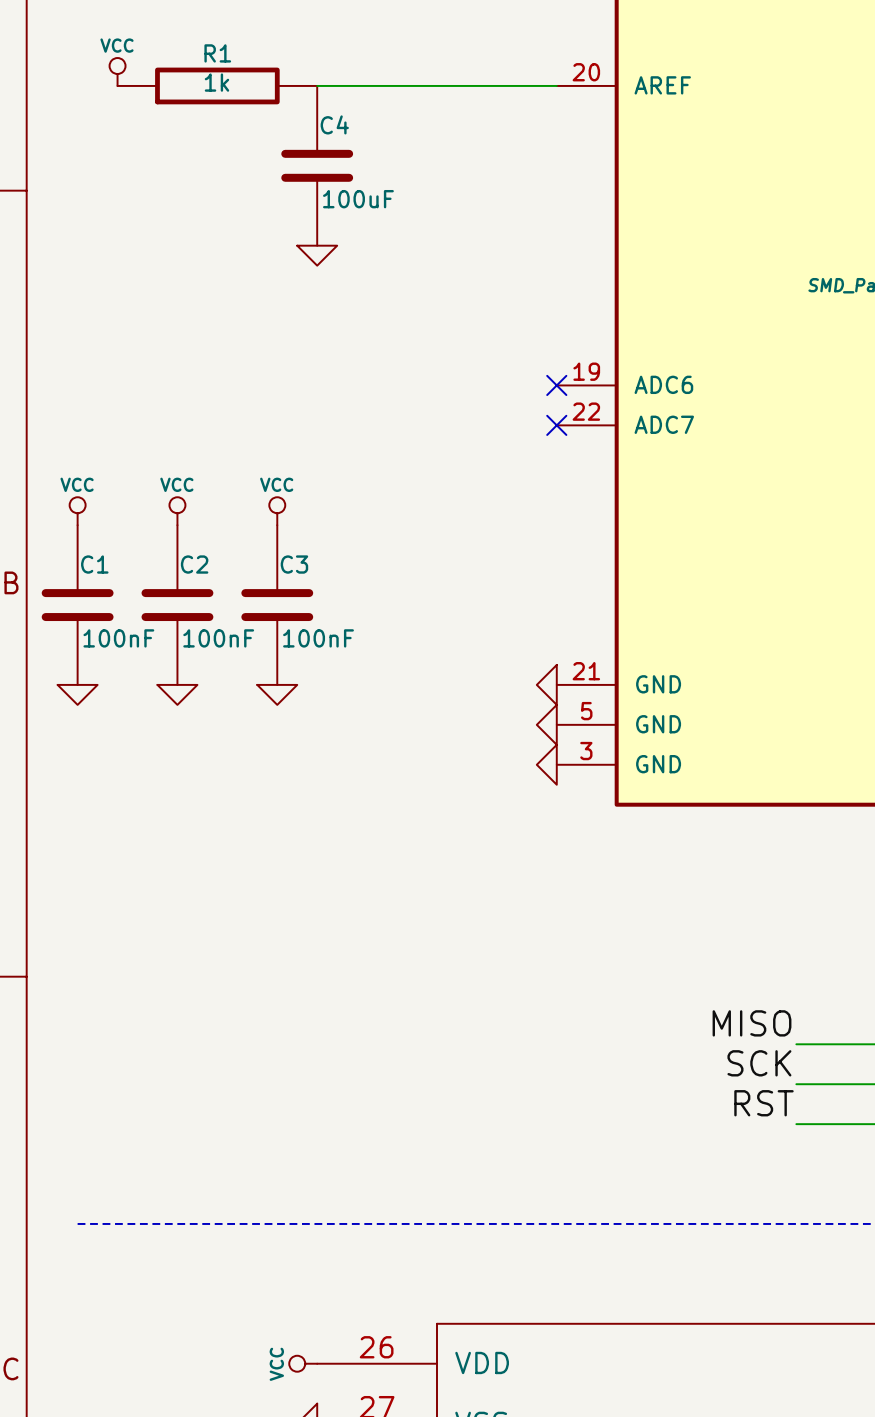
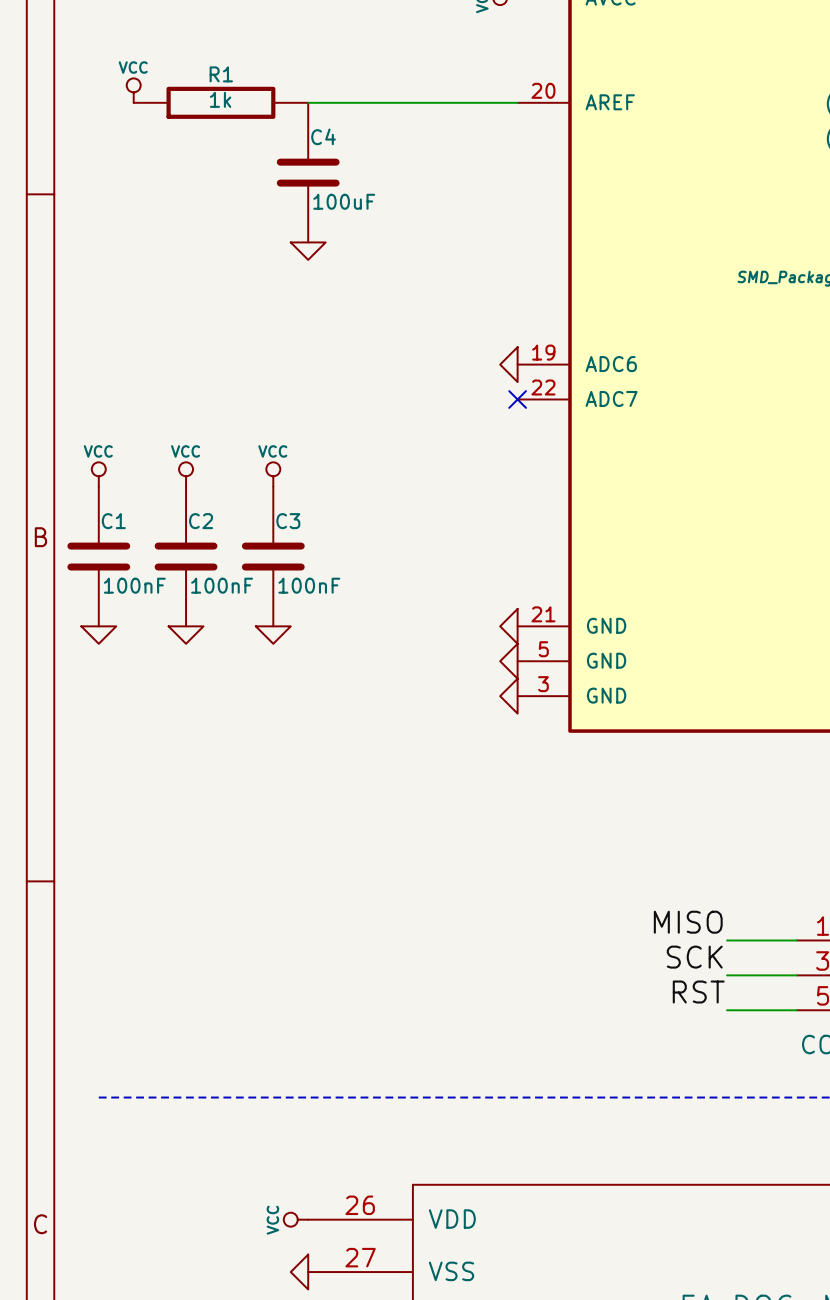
power symbol: none -> (508, 364)
no-connect mark: (556, 385) -> none

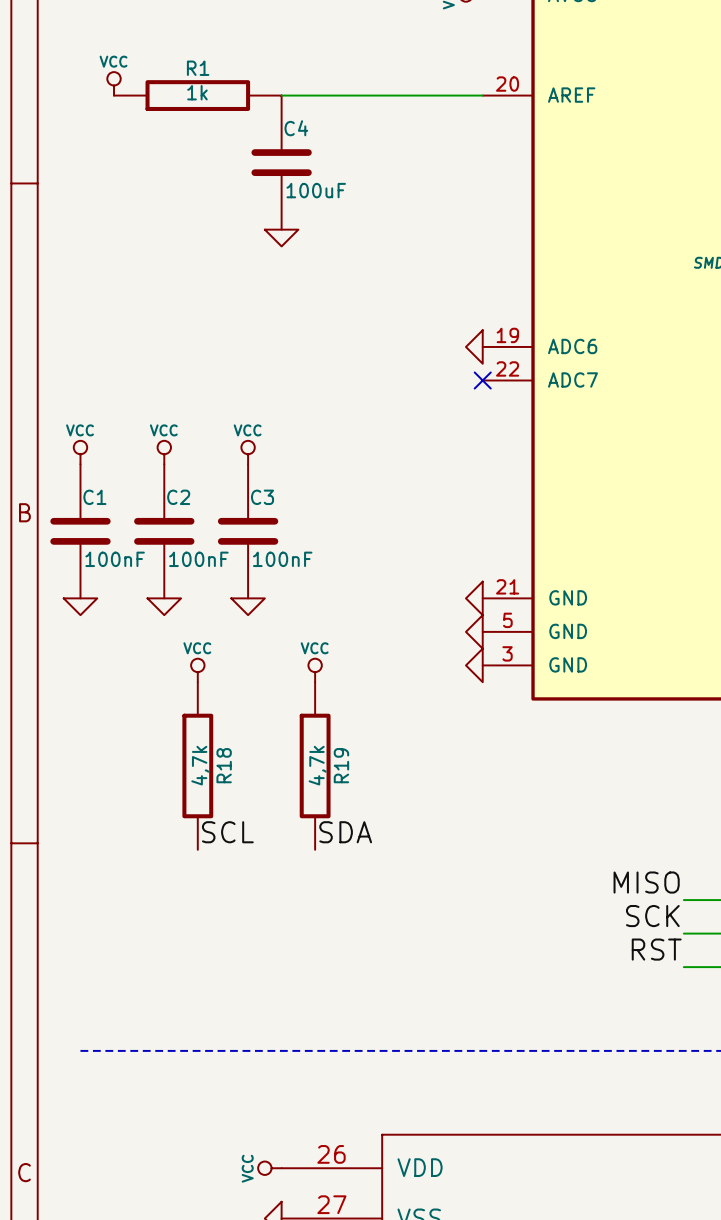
power symbol: none -> VCC (197, 670)
power symbol: none -> VCC (315, 670)
R18: none -> 4,7k (197, 765)
R19: none -> 4,7k (315, 765)
label: none -> SCL (227, 832)
label: none -> SDA (345, 832)

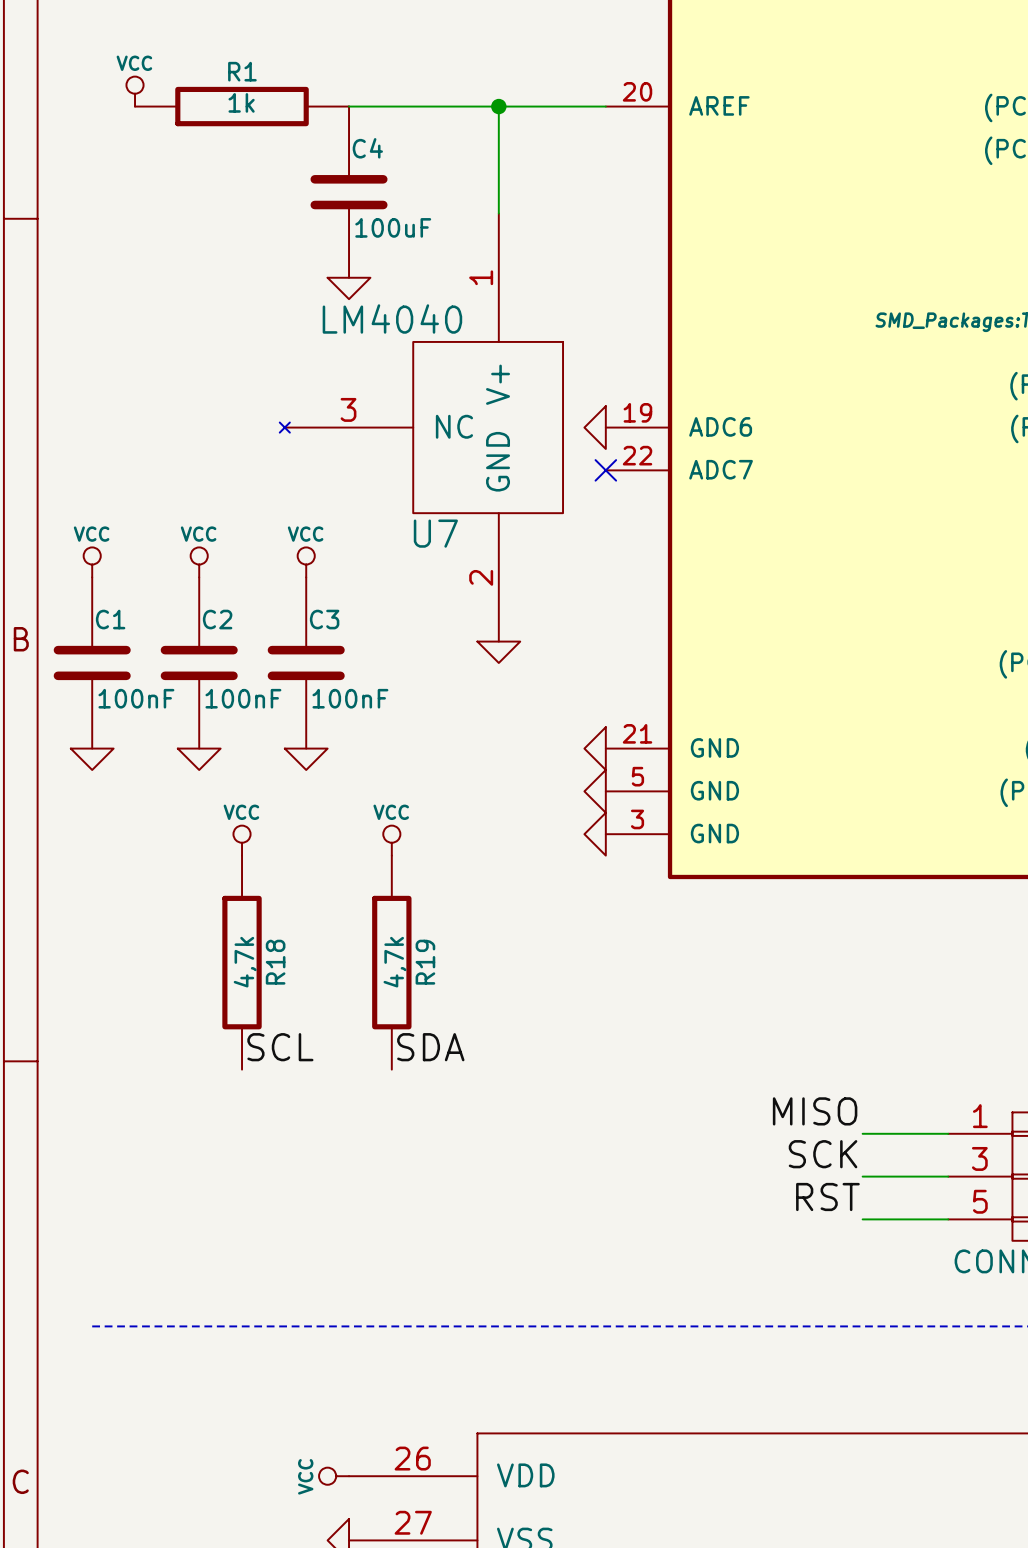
wire: none -> (498, 106) (498, 213)
junction: none -> (498, 106)
U7: none -> LM4040 (421, 427)
power symbol: none -> (498, 652)

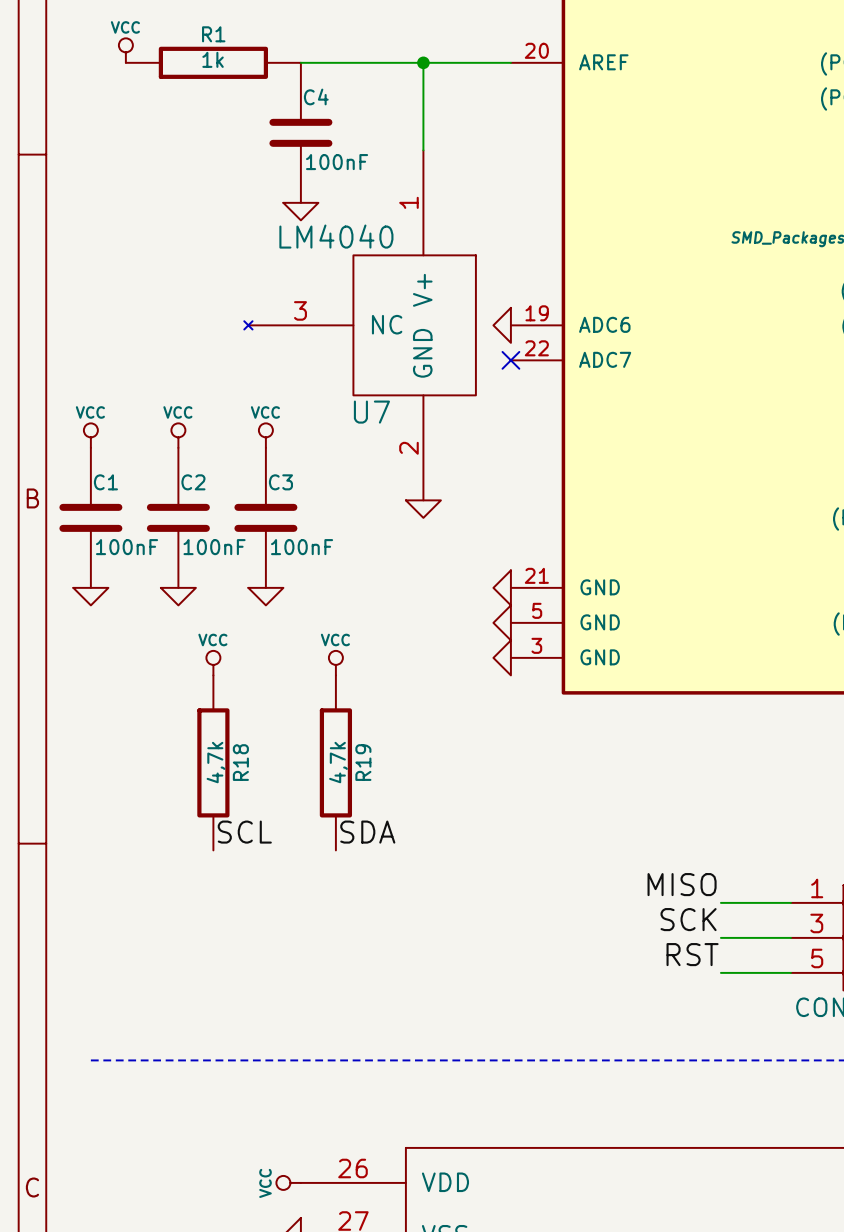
C4 value: 100uF (393, 227) -> 100nF (337, 162)

